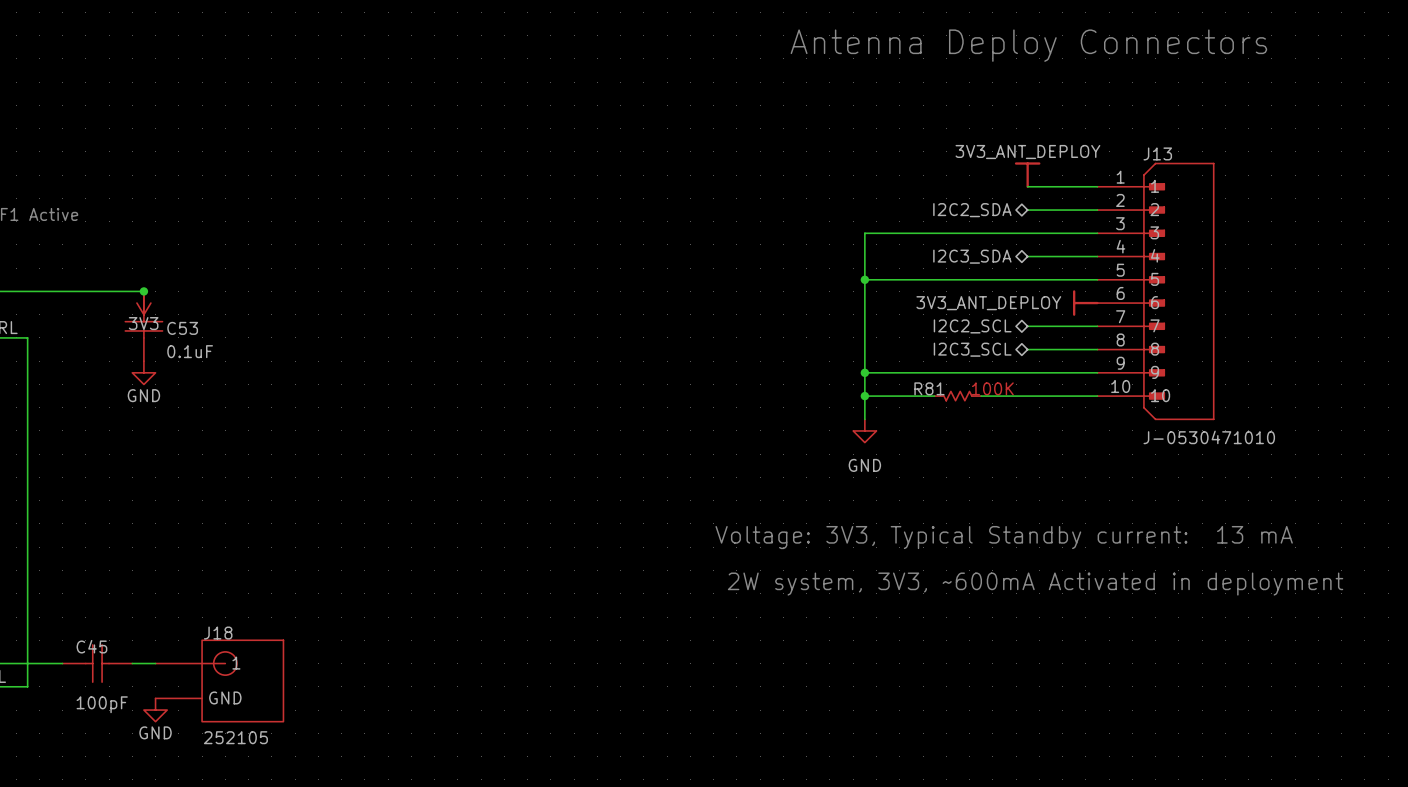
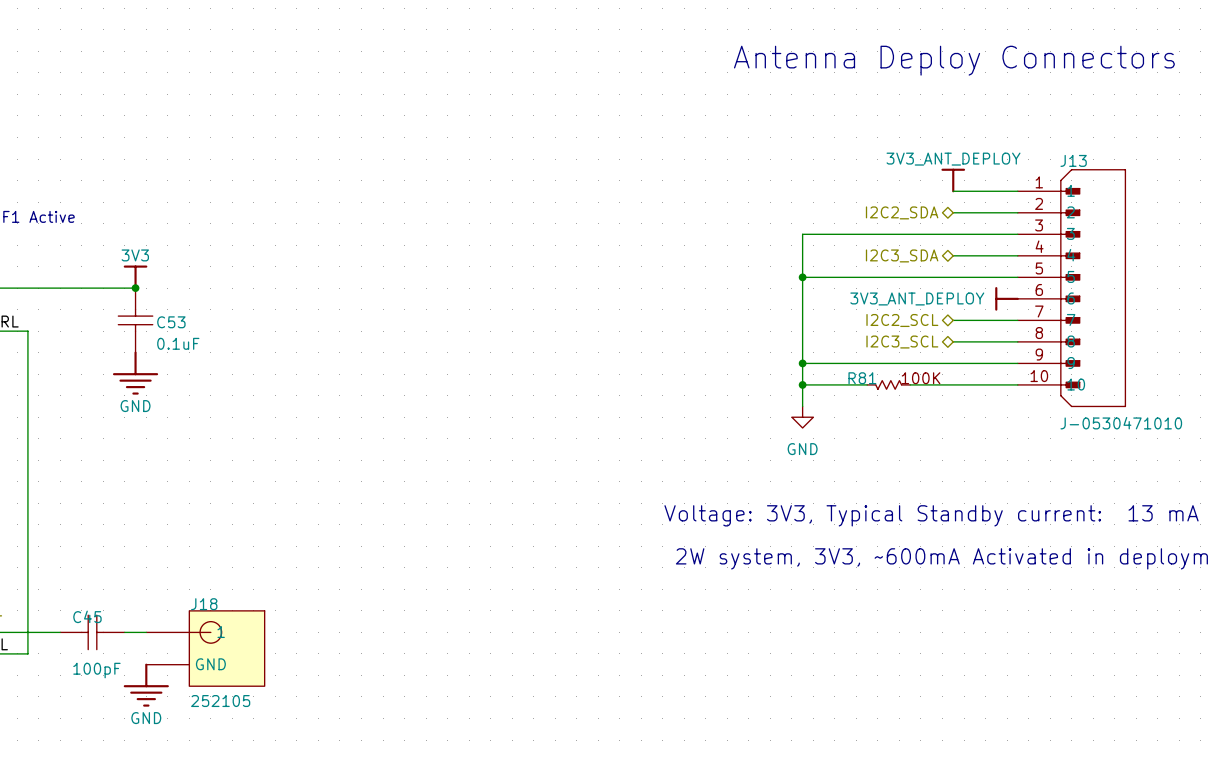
power symbol: none -> 3V3 (135, 277)
power symbol: 3V3 (143, 303) -> none
power symbol: GND (143, 372) -> none
power symbol: none -> GND (135, 373)
power symbol: GND (155, 710) -> none
power symbol: none -> GND (146, 685)

